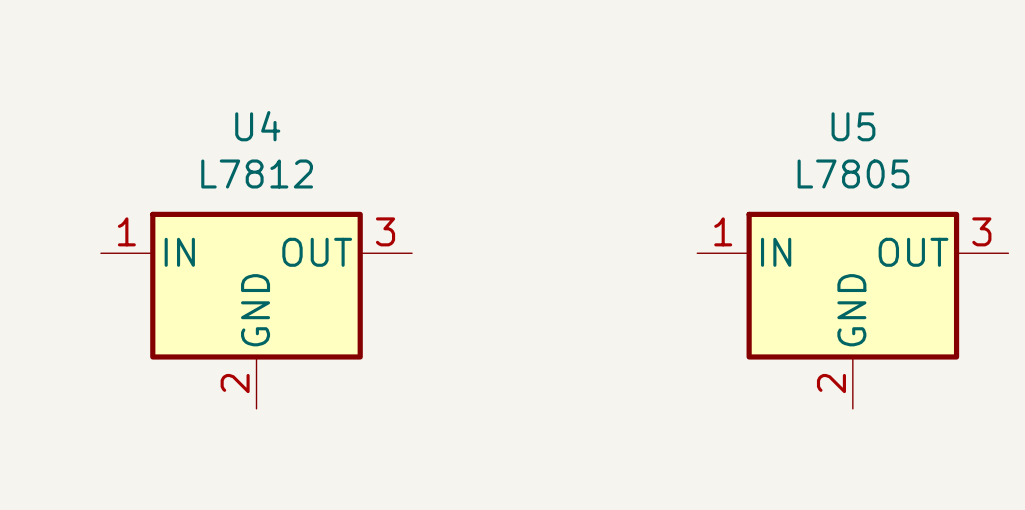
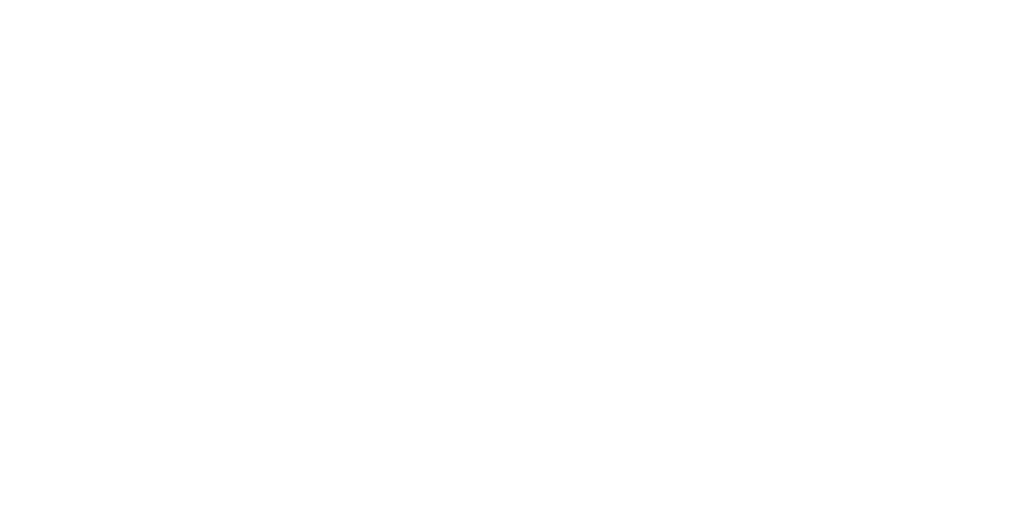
U4: L7812 (256, 310) -> none
U5: L7805 (852, 310) -> none

